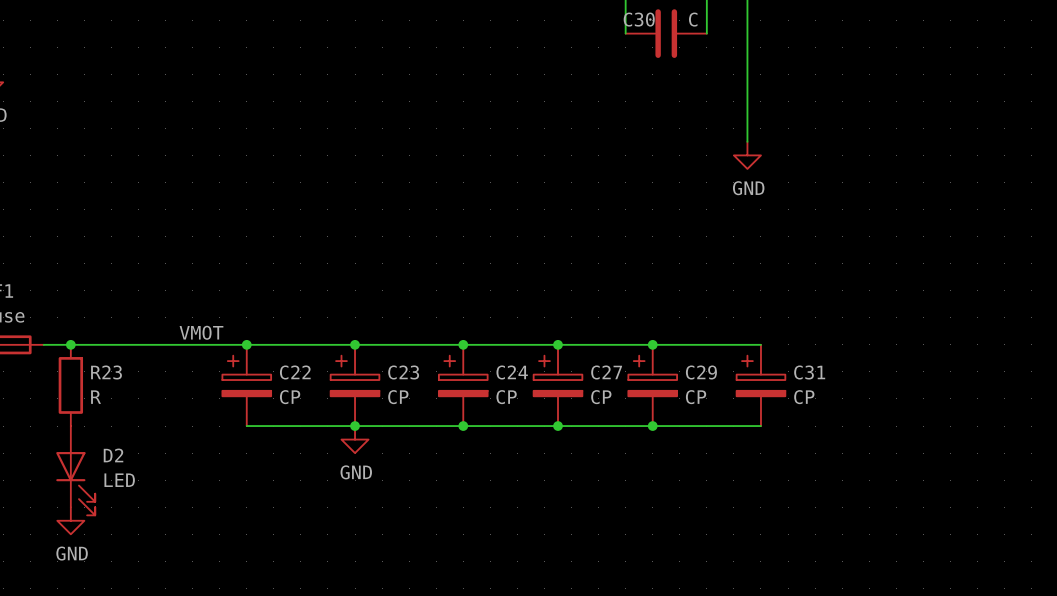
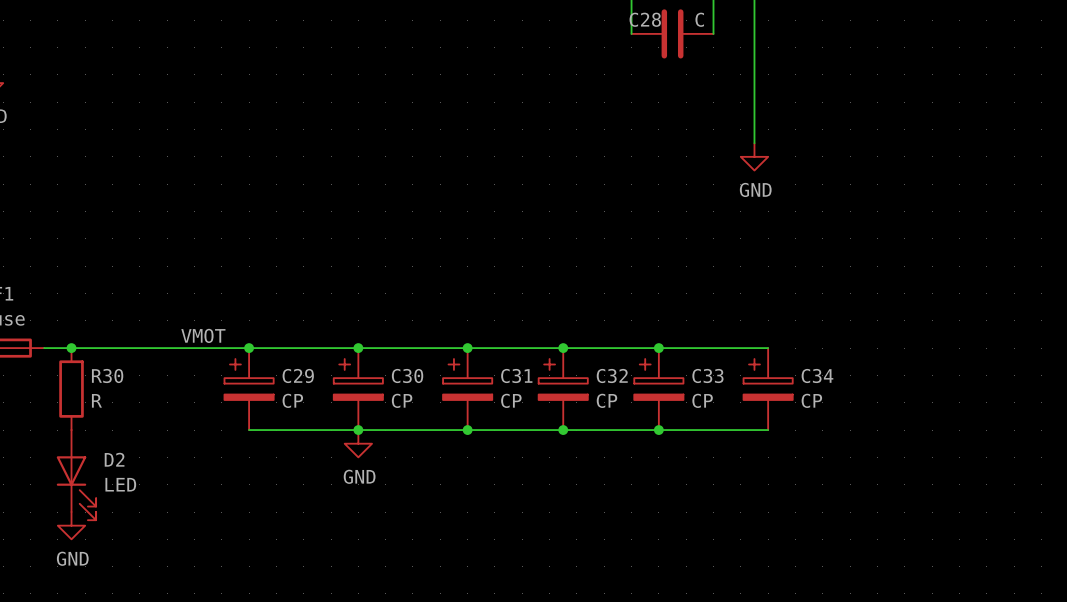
C30 name: C30 (639, 19) -> C28 (645, 19)
R23 name: R23 (106, 372) -> R30 (107, 376)
C22 name: C22 (295, 372) -> C29 (298, 376)
C23 name: C23 (403, 372) -> C30 (407, 376)
C24 name: C24 (512, 372) -> C31 (516, 376)
C27 name: C27 (606, 372) -> C32 (612, 376)
C29 name: C29 (701, 372) -> C33 (707, 376)
C31 name: C31 (809, 372) -> C34 (817, 376)

